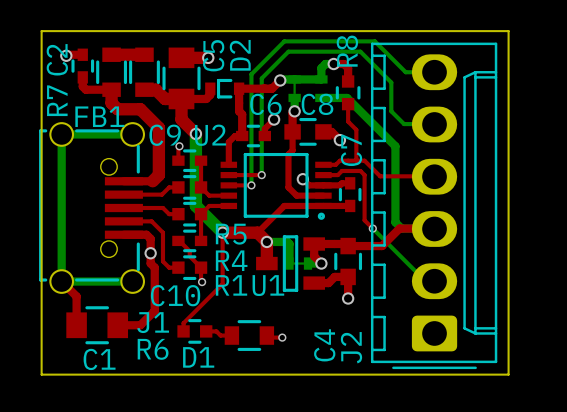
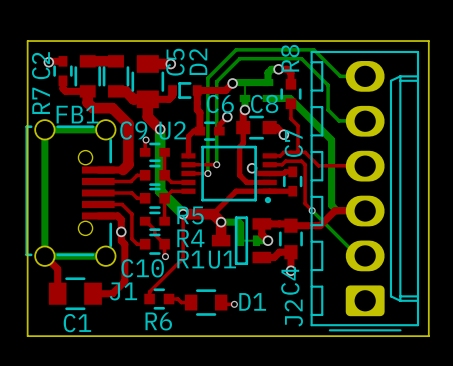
C4 name position: C4 (324, 345) -> C4 (290, 280)
R6 name position: R6 (153, 349) -> R6 (158, 321)
D1 name position: D1 (198, 357) -> D1 (252, 301)

